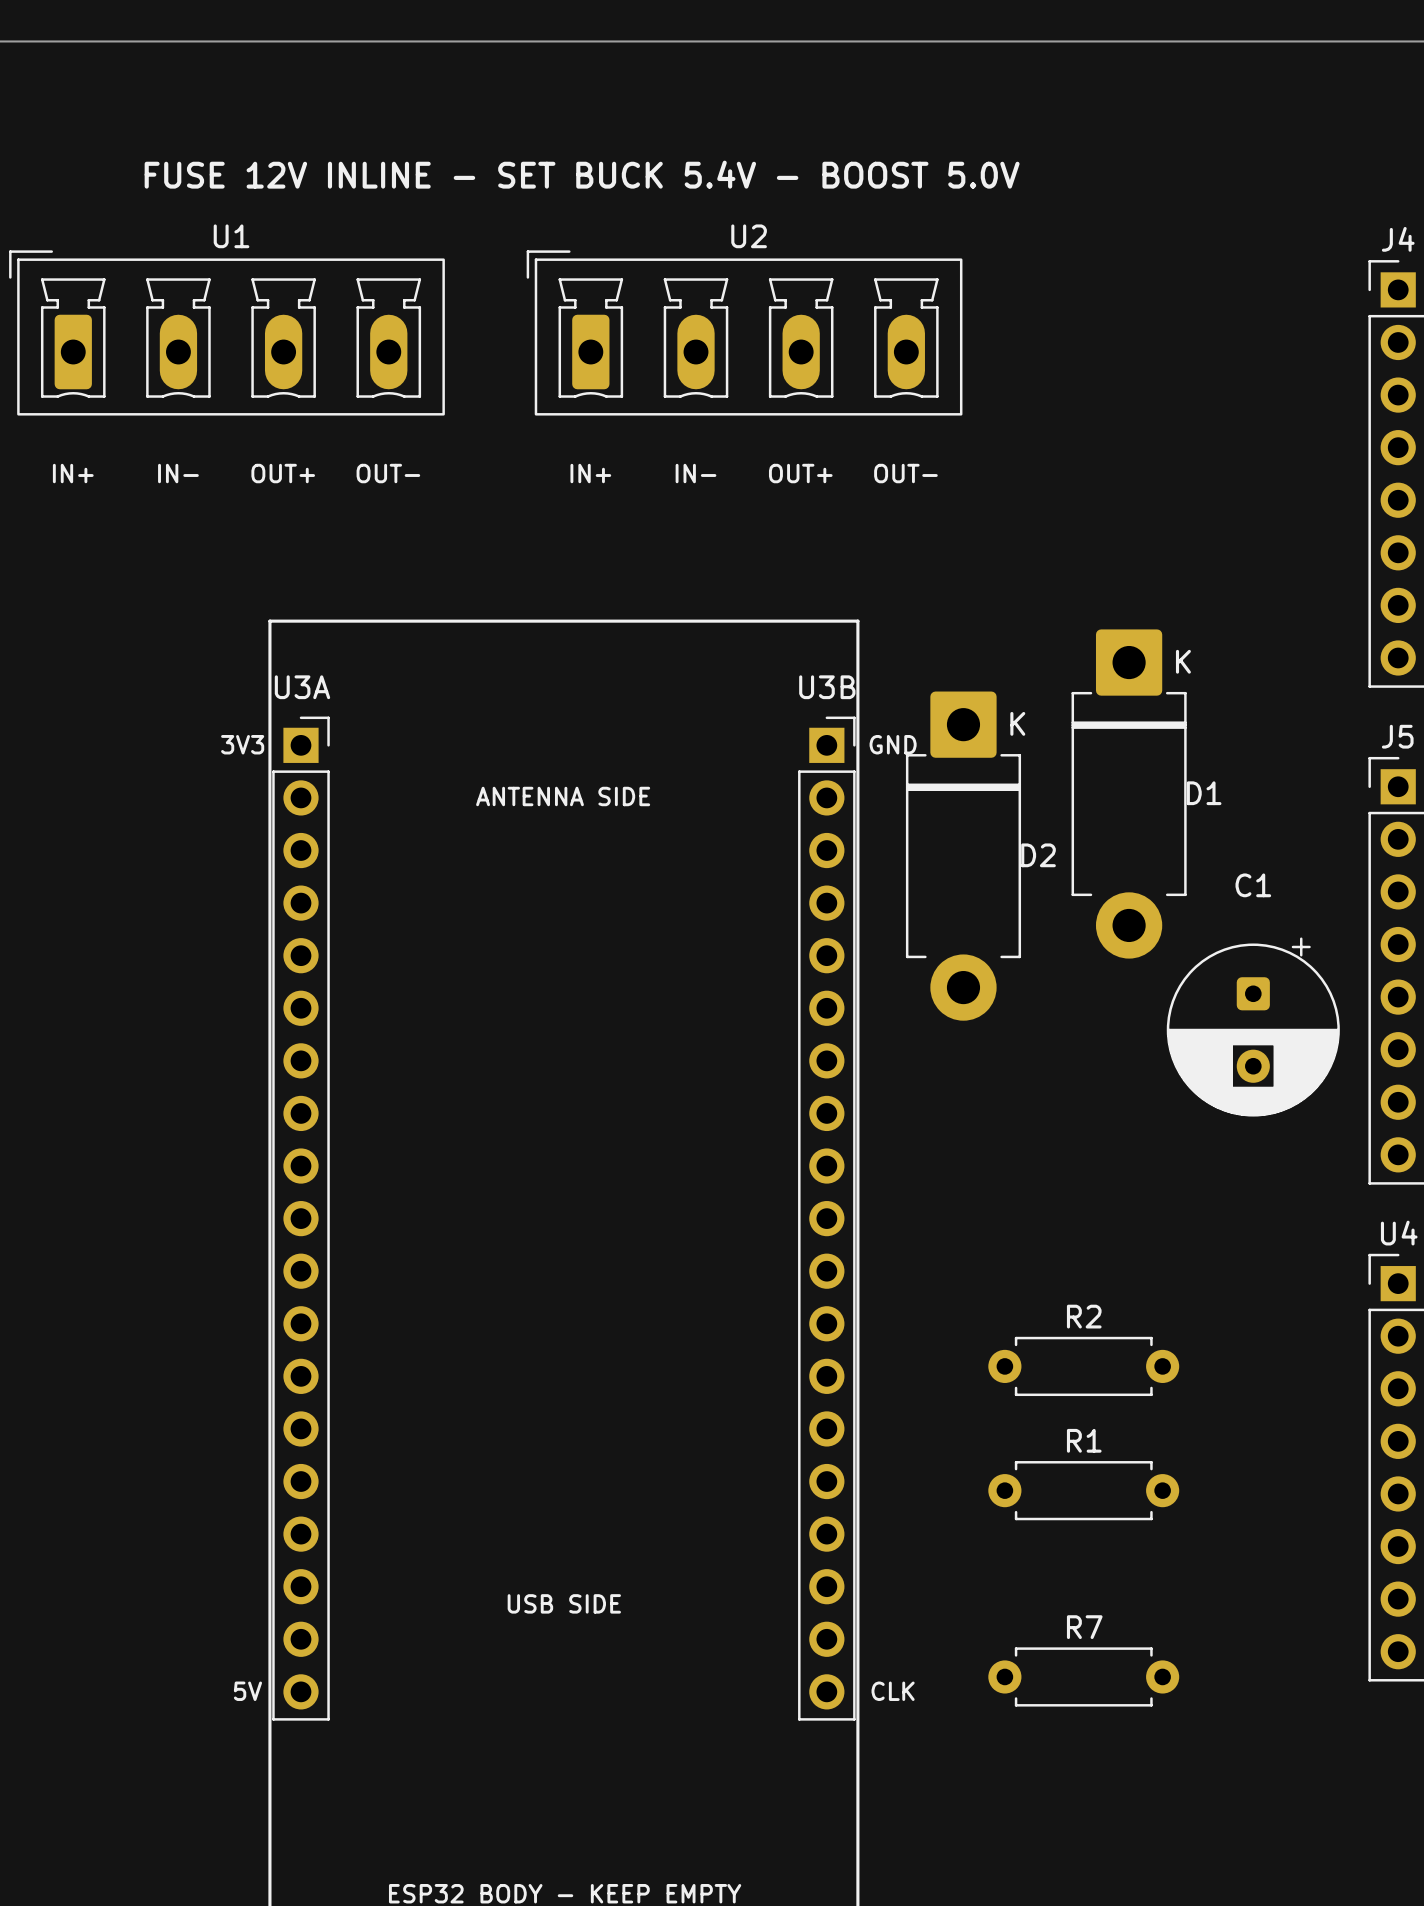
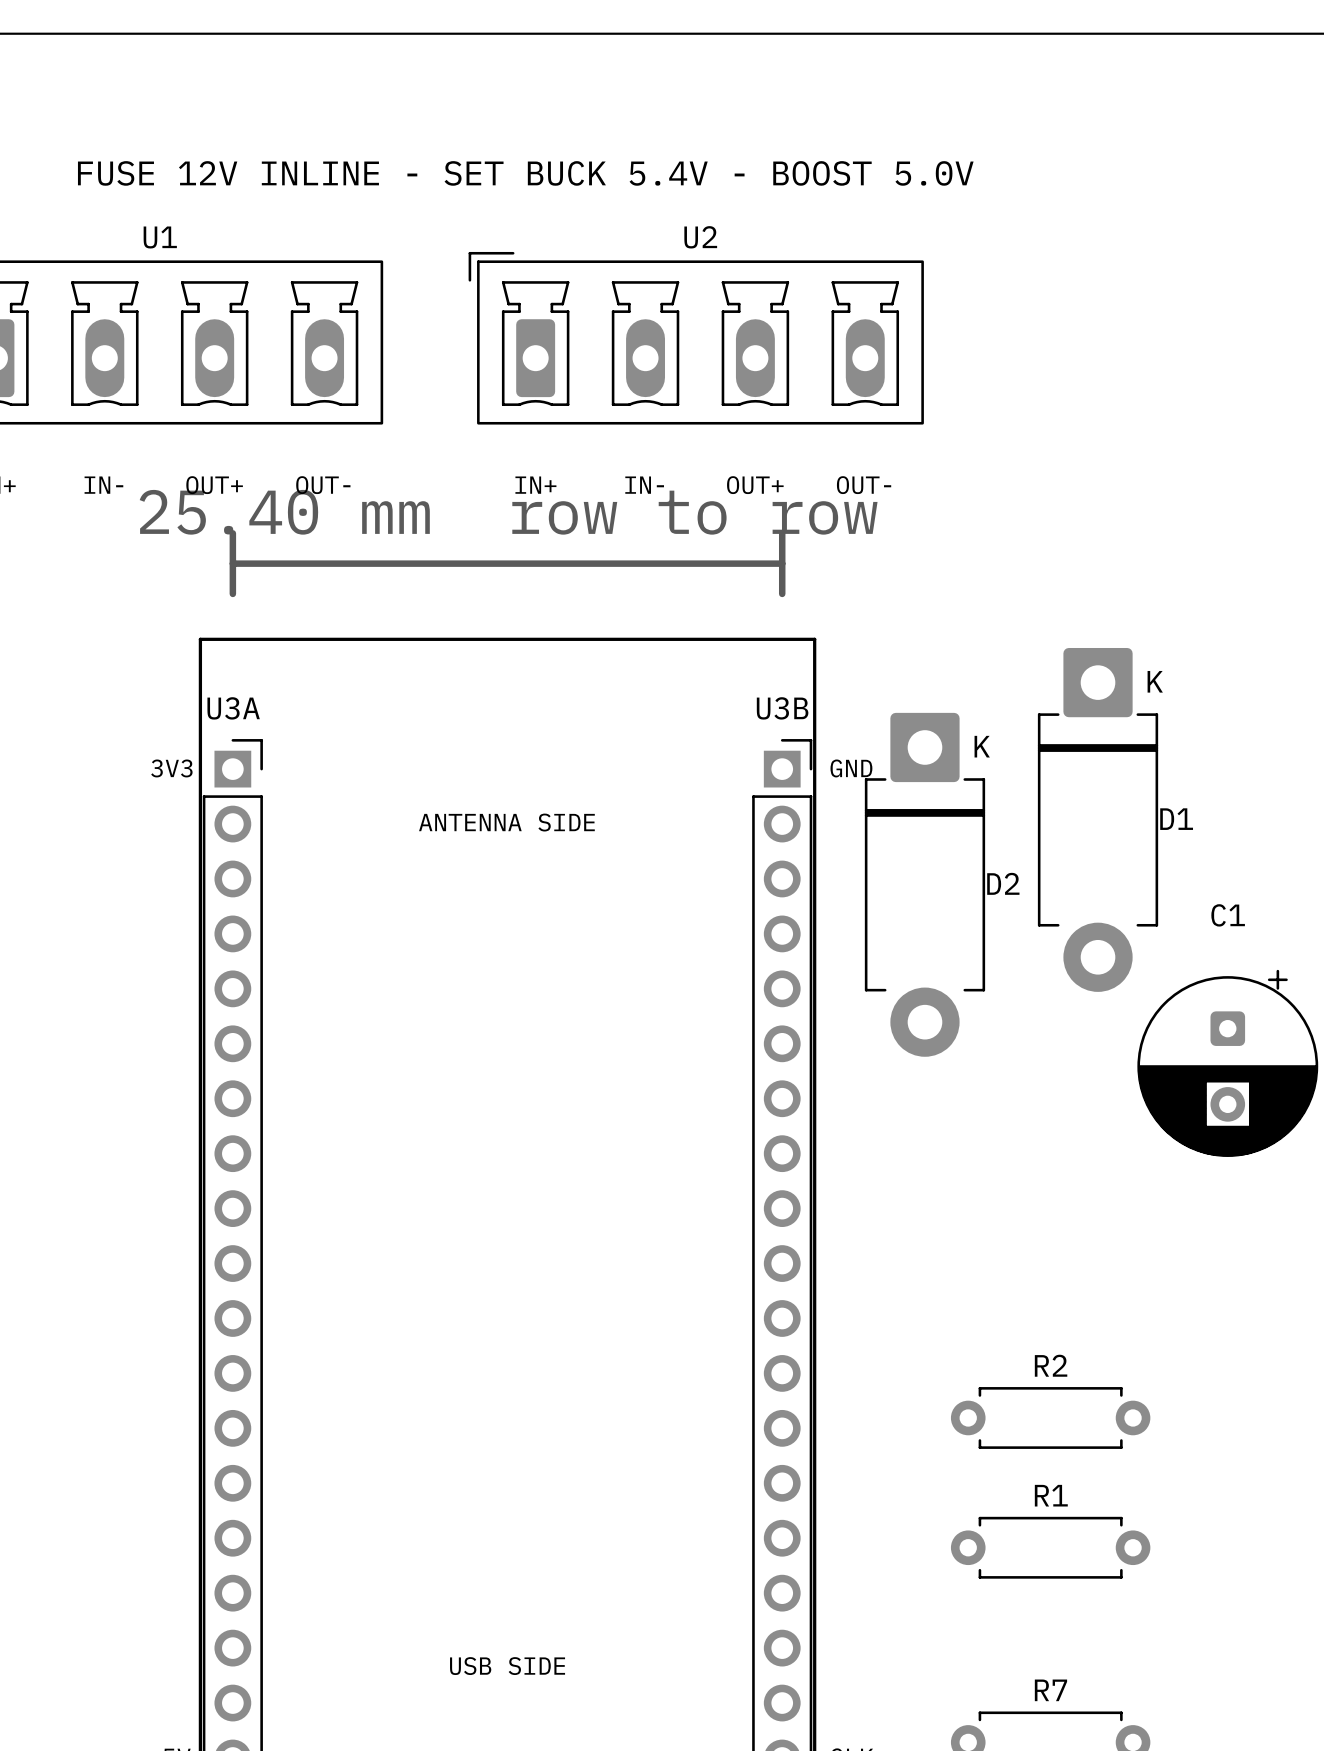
text: none -> 25.40 mm row to row (508, 512)
line: none -> (232, 533) (232, 593)
line: none -> (782, 533) (782, 593)
line: none -> (232, 563) (782, 563)

